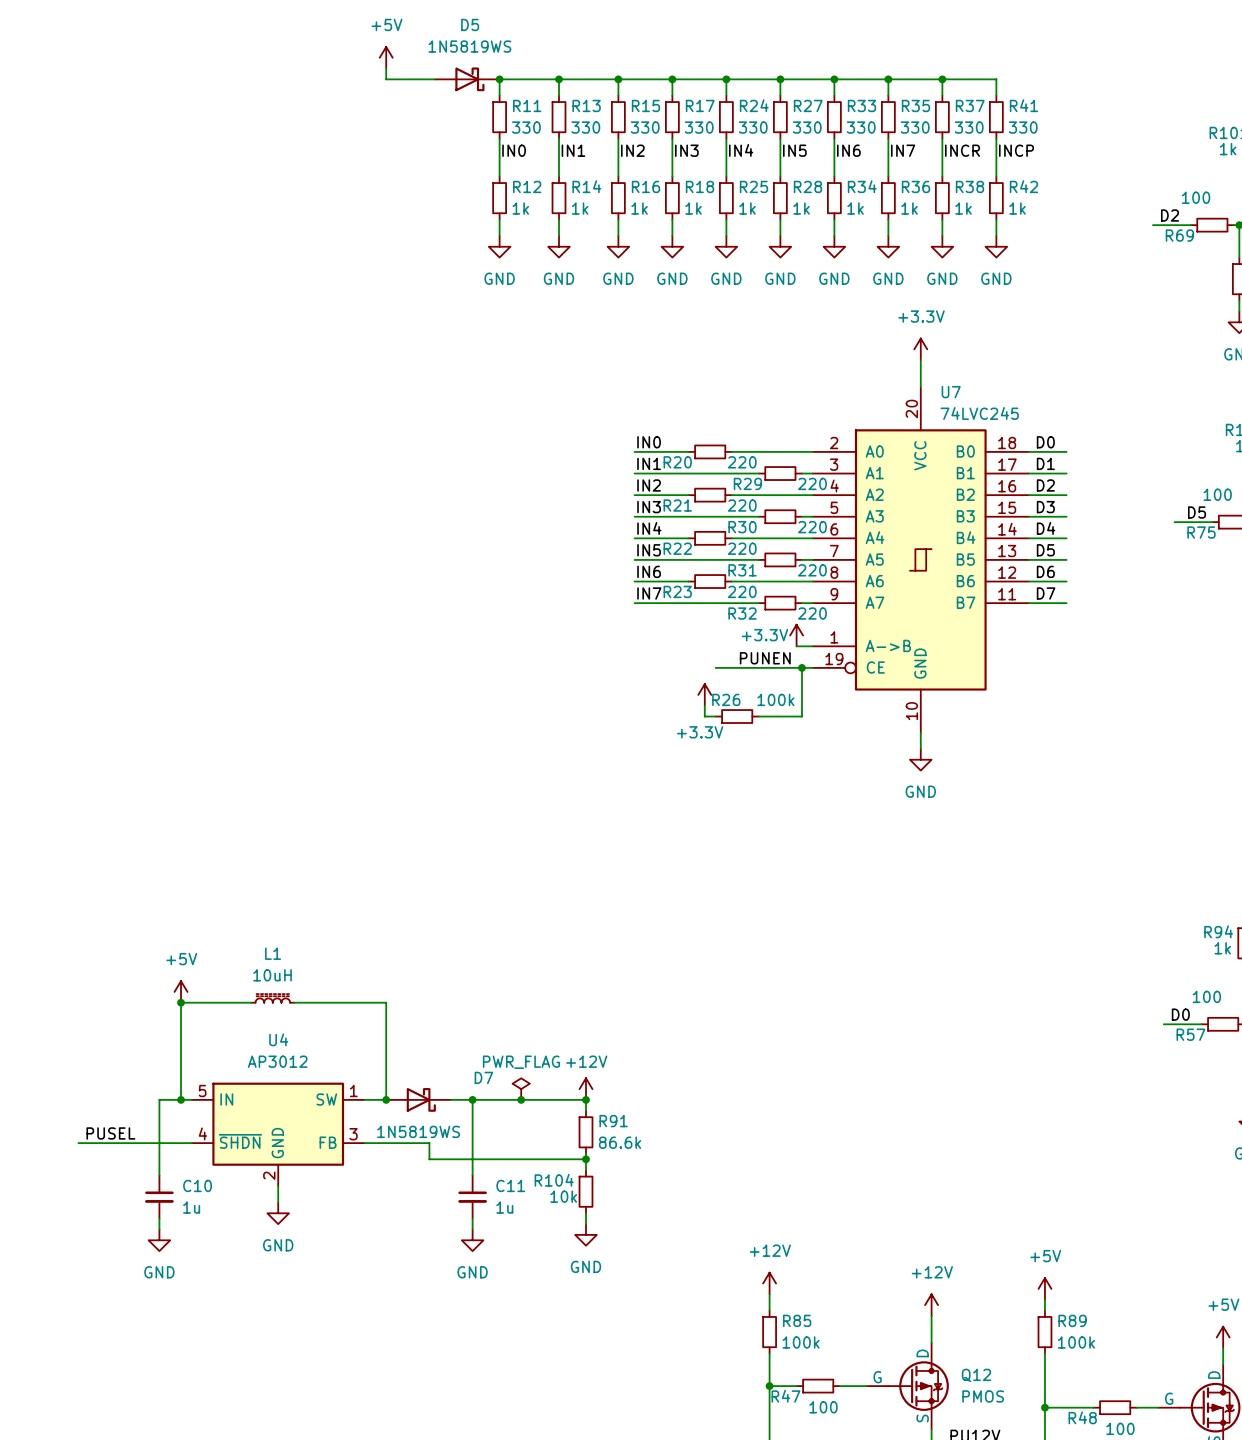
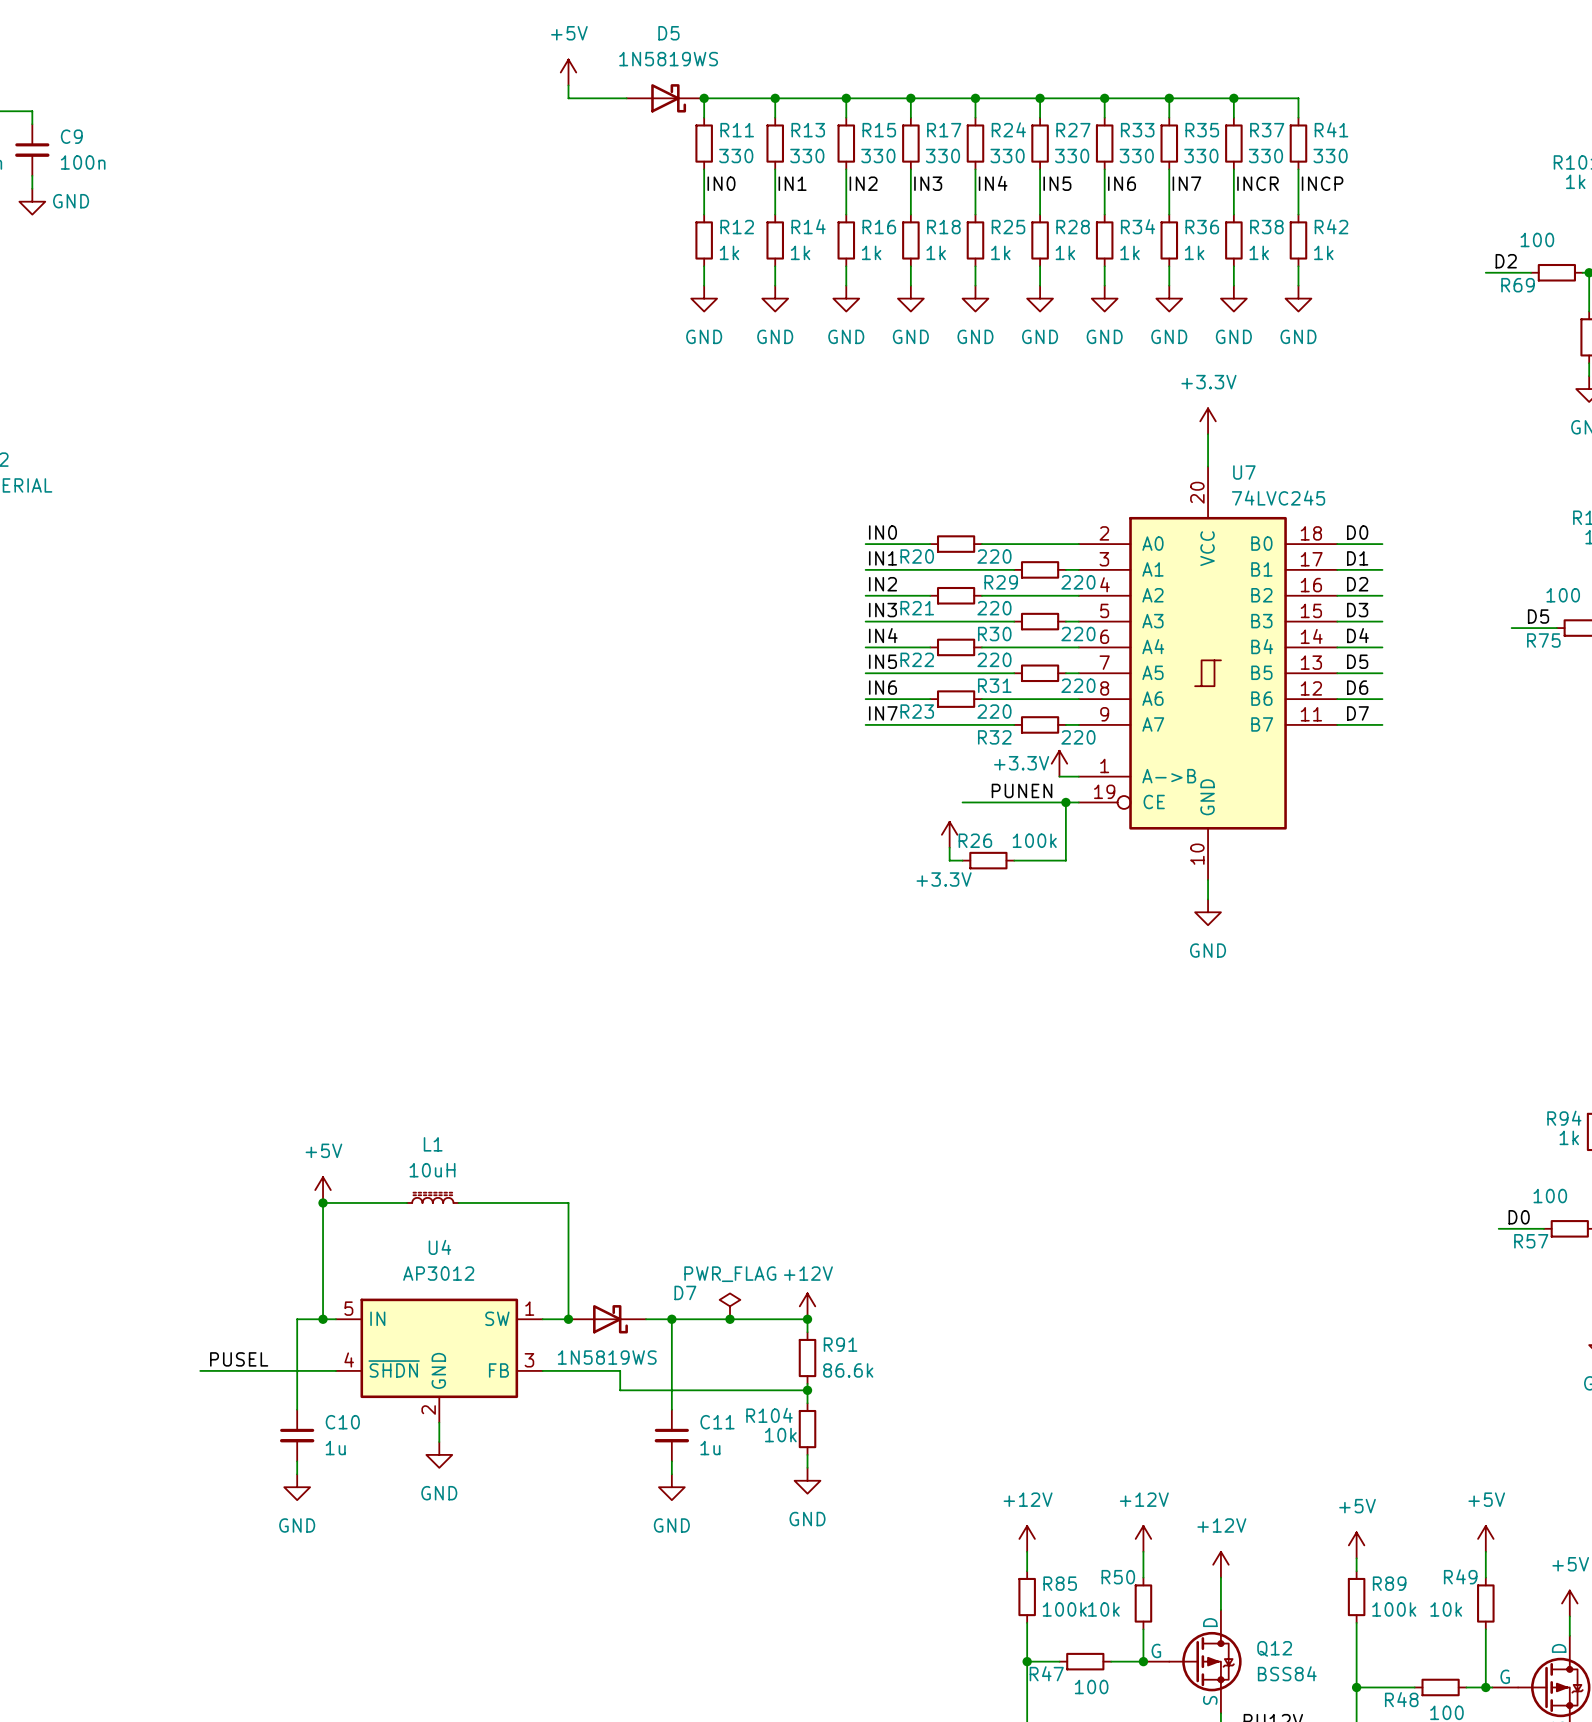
power symbol: none -> +12V (1143, 1538)
power symbol: none -> +5V (1485, 1538)
wire: none -> (1143, 1551) (1143, 1577)
wire: none -> (1485, 1551) (1485, 1577)
R50: none -> 10k (1143, 1603)
R49: none -> 10k (1485, 1603)
wire: none -> (1143, 1629) (1143, 1661)
wire: none -> (1485, 1629) (1485, 1687)
junction: none -> (1143, 1661)
Q12 value: PMOS (983, 1396) -> BSS84 (1287, 1673)
junction: none -> (1485, 1687)

